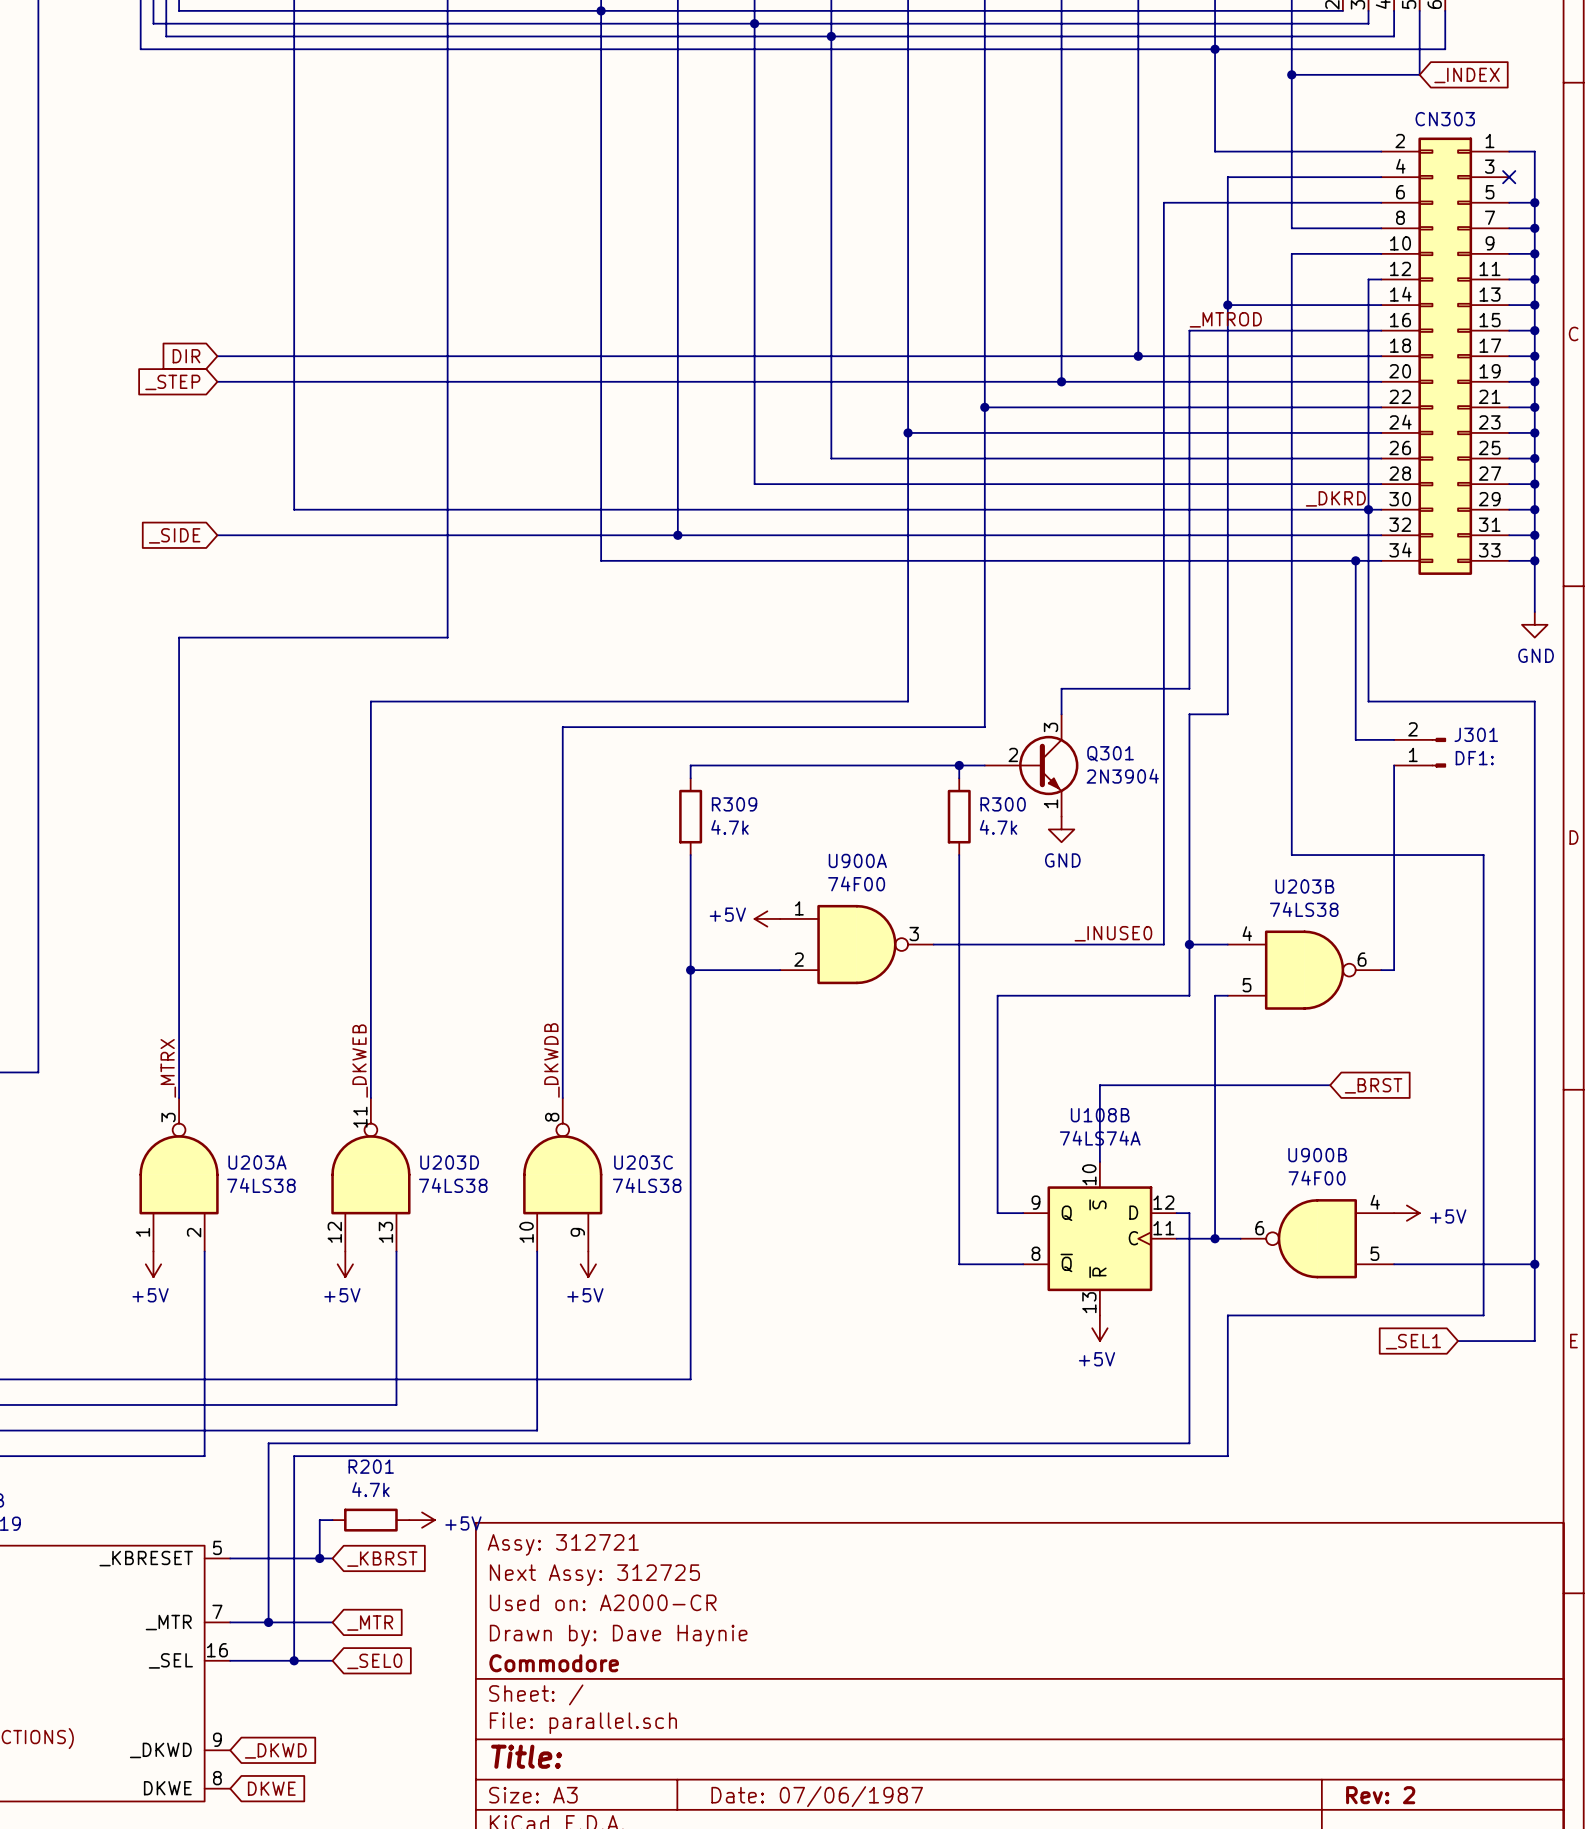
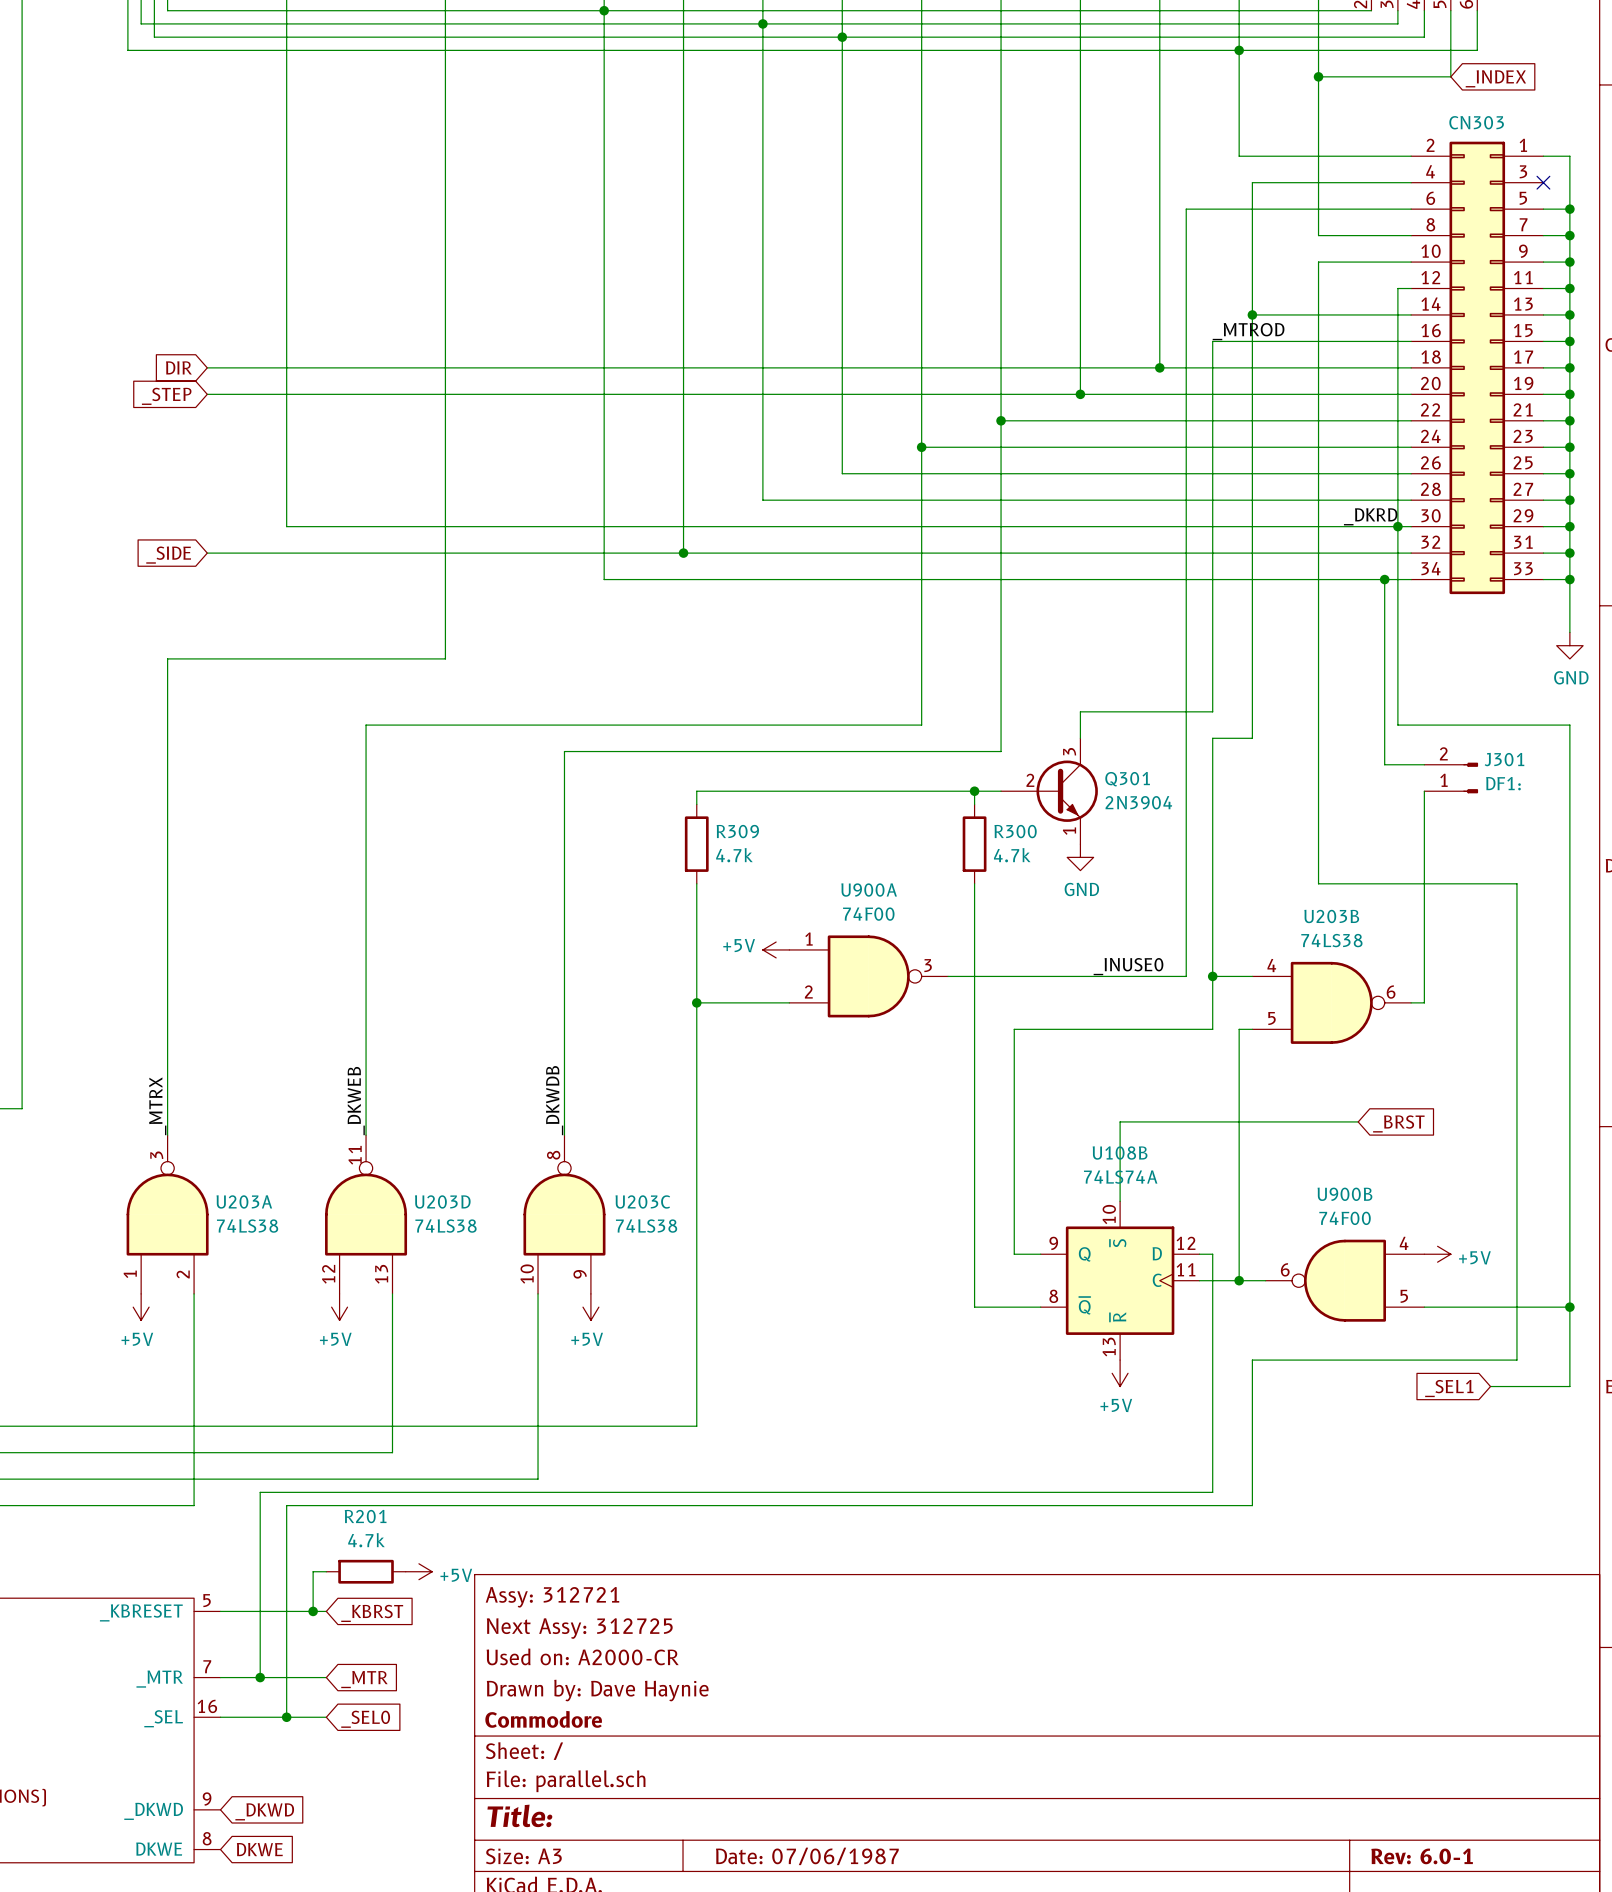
title block: Rev: 2 (1380, 1795) -> Rev: 6.0-1 (1422, 1856)

